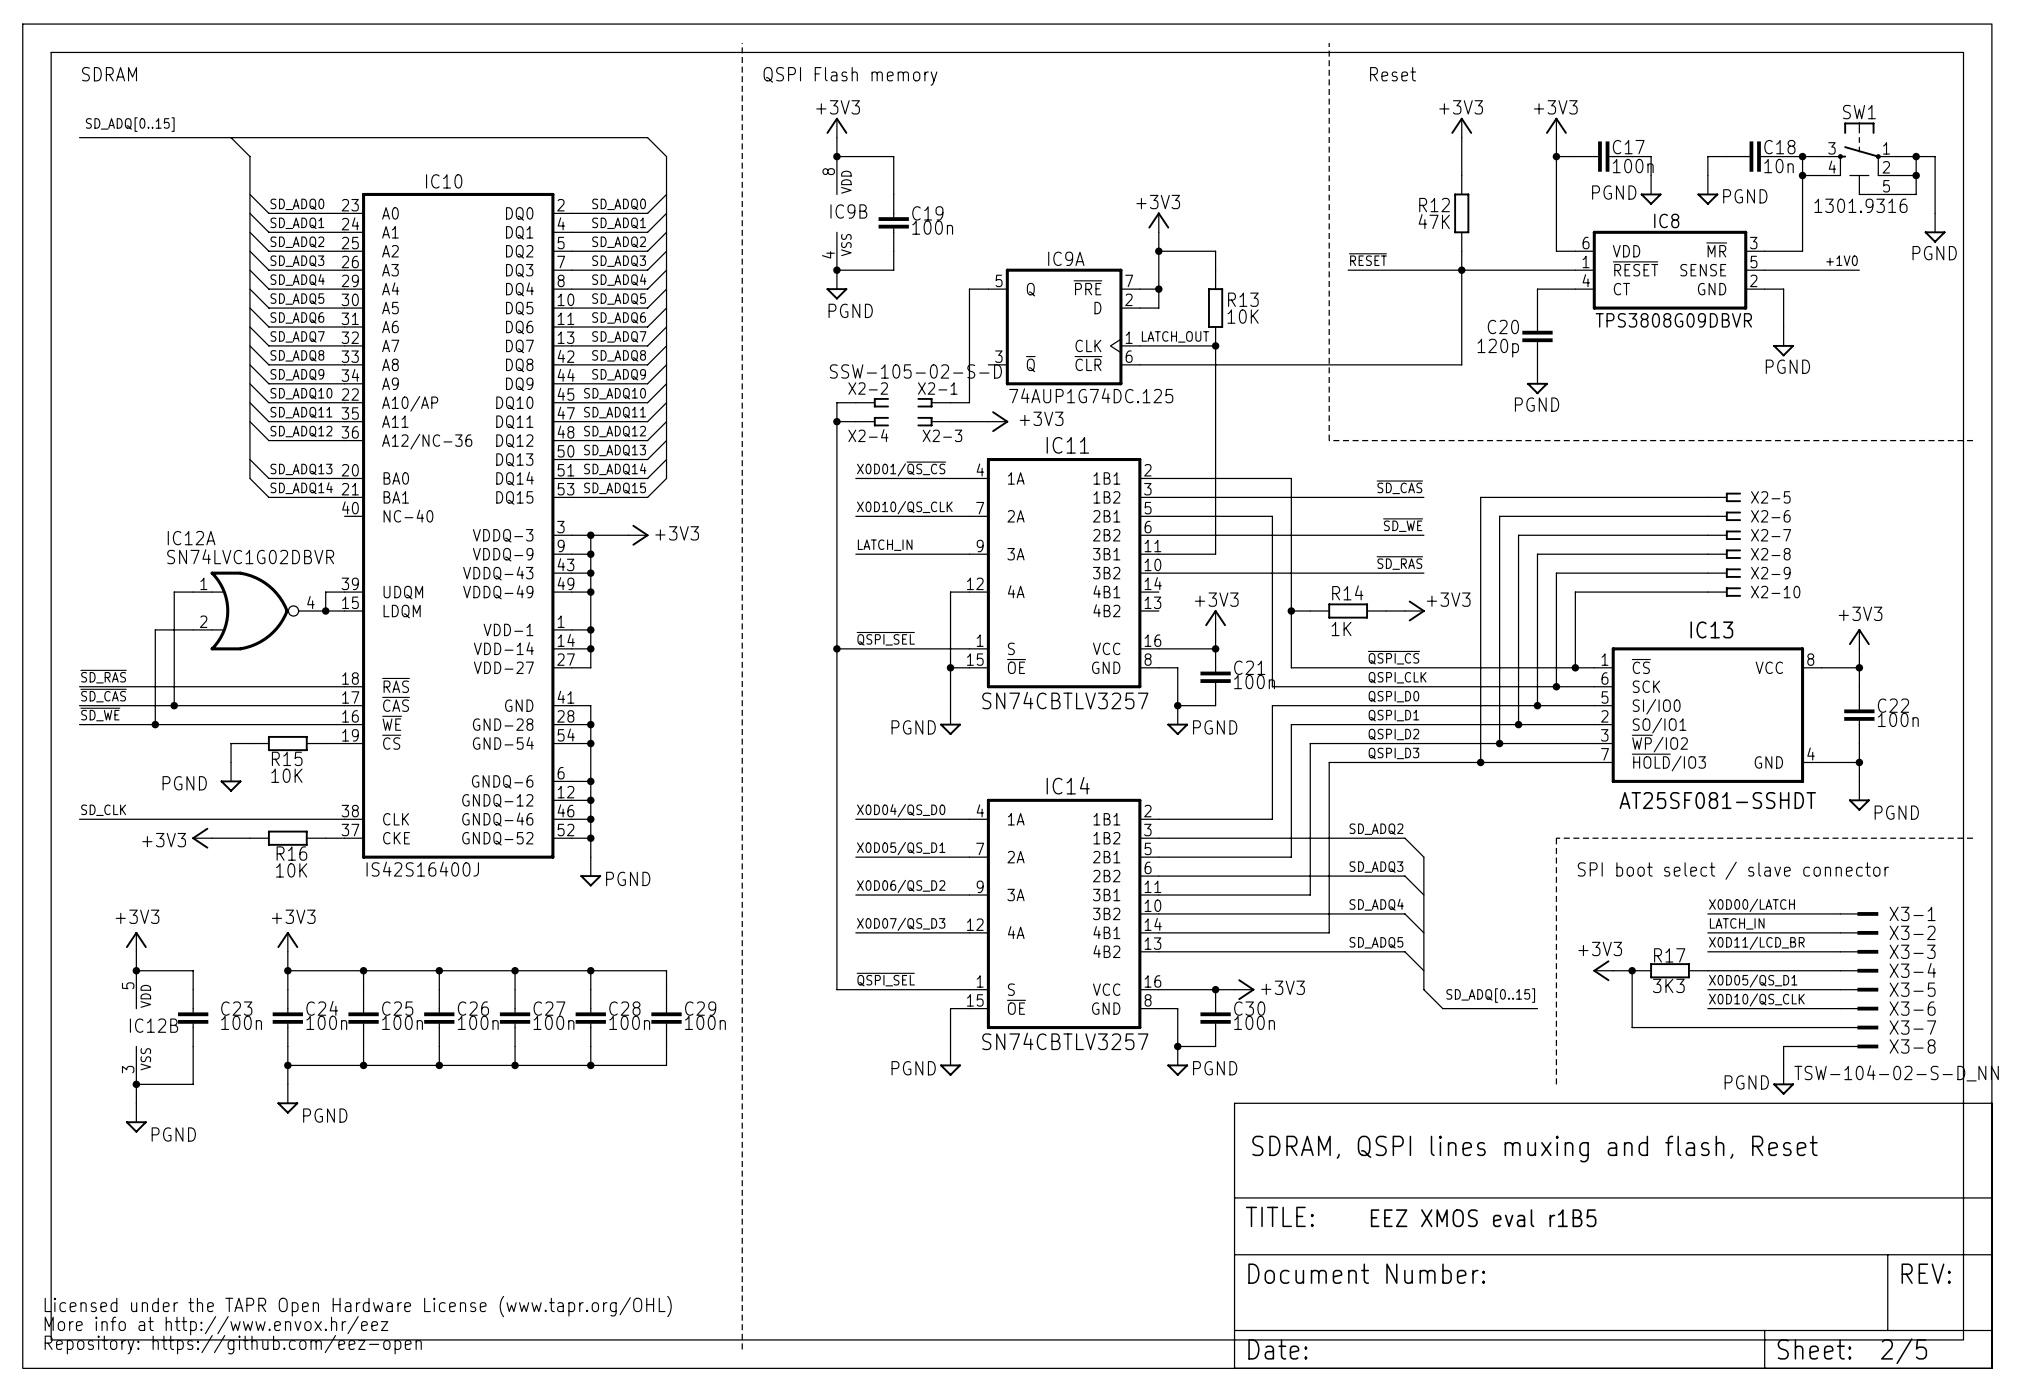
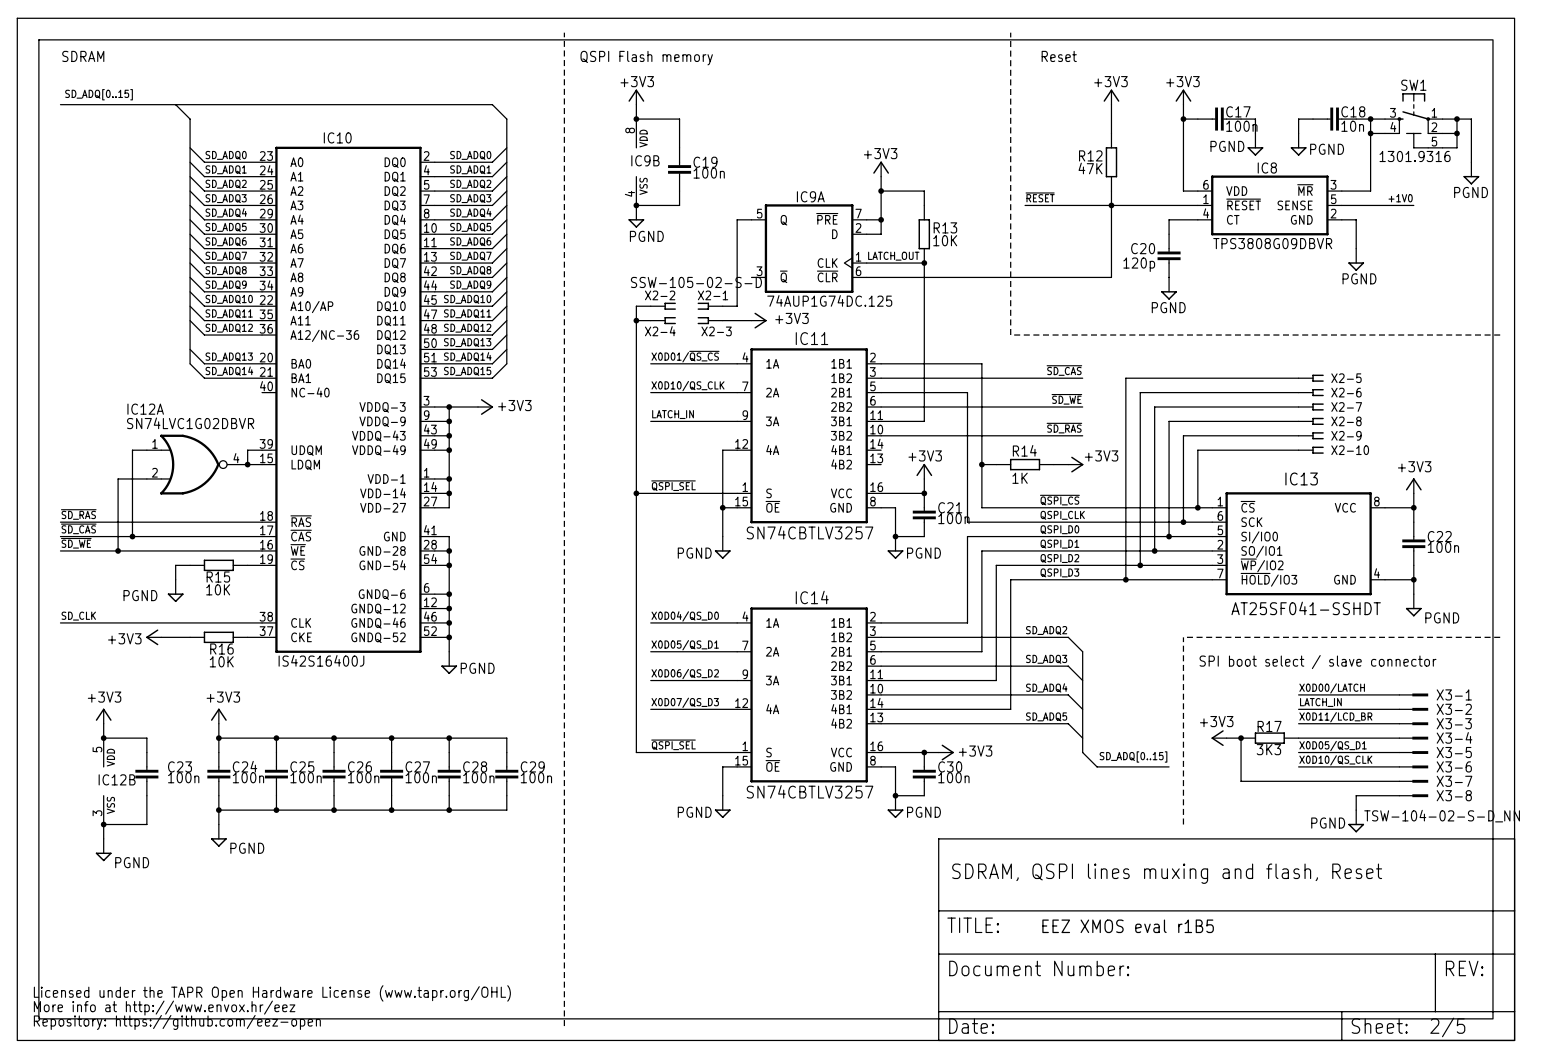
IC13 value: AT25SF081-SSHDT (1717, 800) -> AT25SF041-SSHDT (1306, 608)

